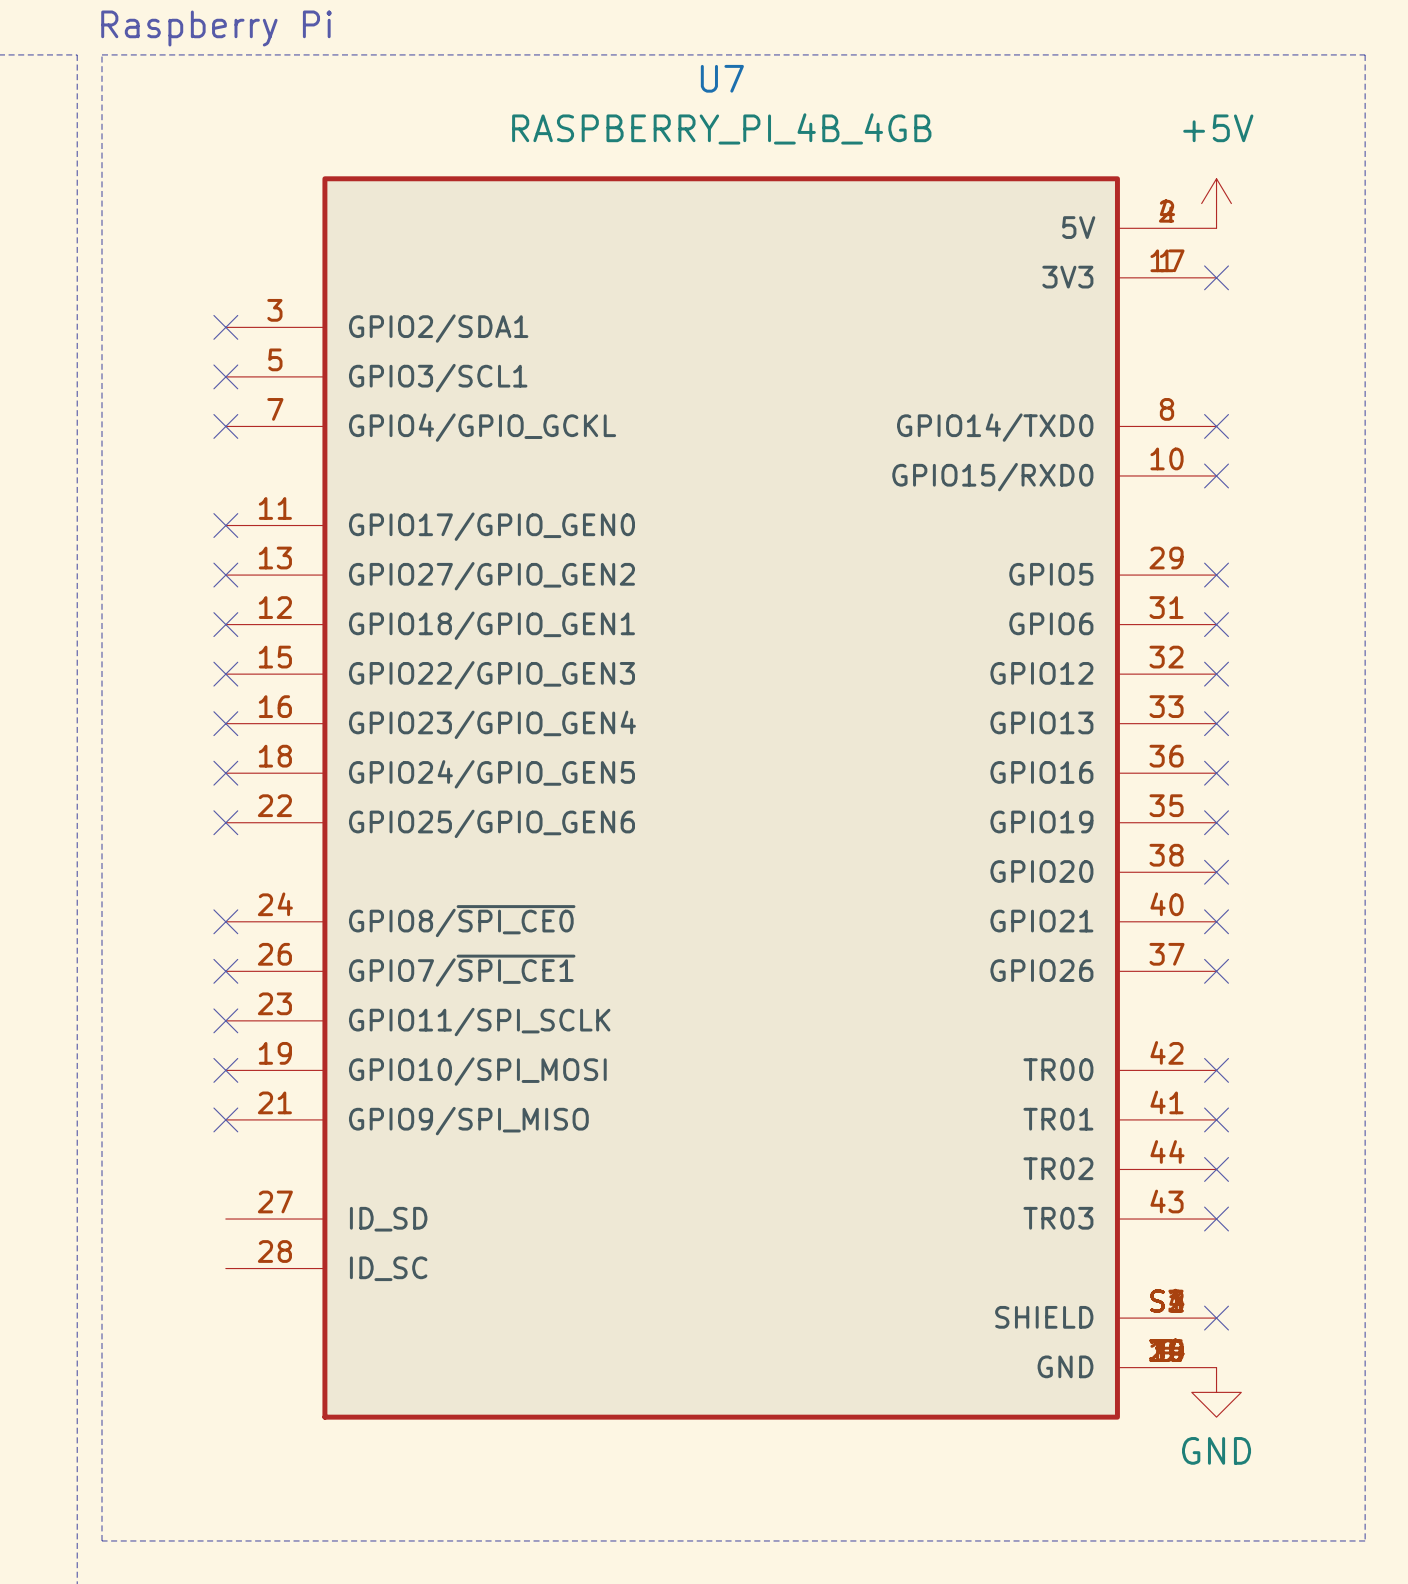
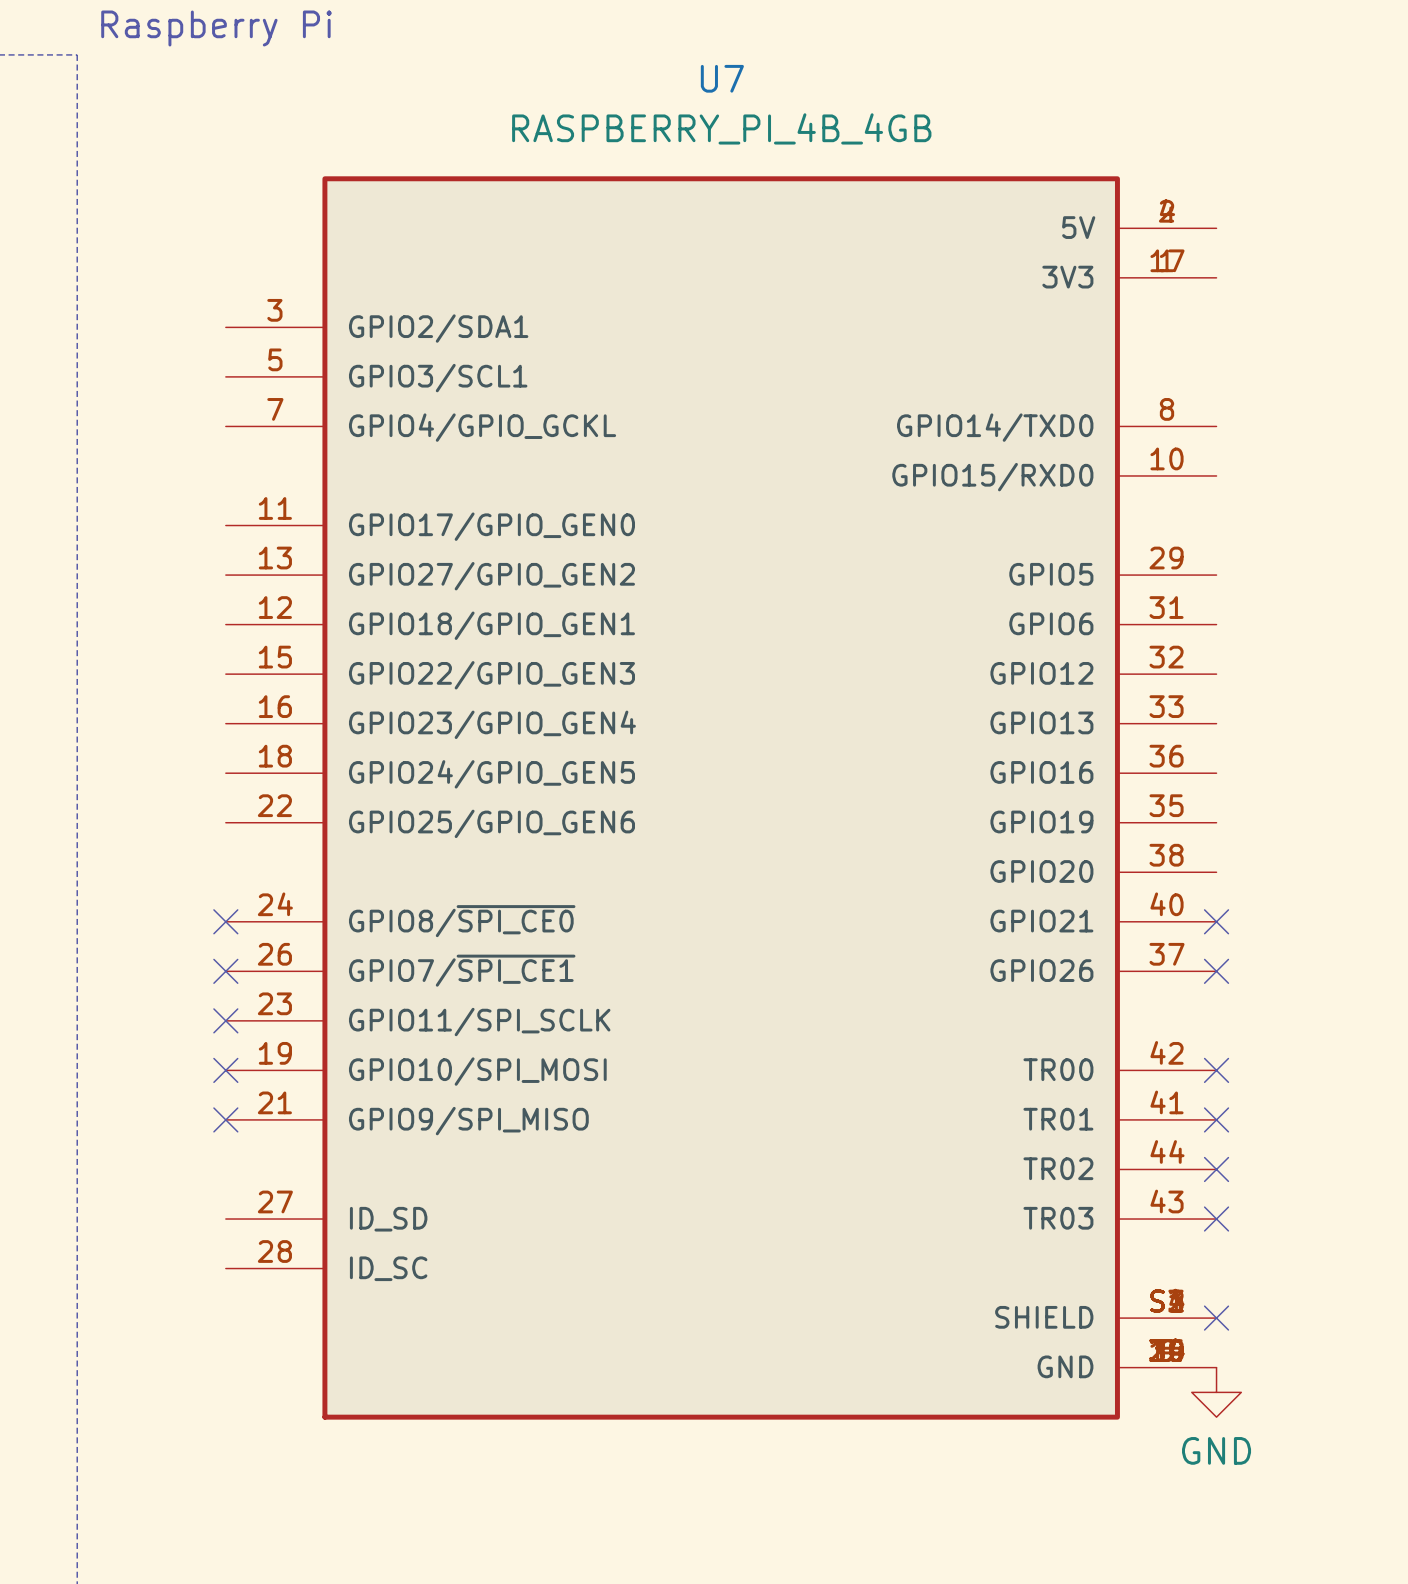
line: (102, 54) (1365, 54) (1365, 1540) (102, 1540) (102, 54) -> none
power symbol: +5V (1216, 203) -> none
no-connect mark: (1216, 277) -> none
no-connect mark: (225, 327) -> none
no-connect mark: (225, 376) -> none
no-connect mark: (225, 426) -> none
no-connect mark: (1216, 426) -> none
no-connect mark: (1216, 475) -> none
no-connect mark: (225, 525) -> none
no-connect mark: (225, 575) -> none
no-connect mark: (1216, 575) -> none
no-connect mark: (225, 624) -> none
no-connect mark: (1216, 624) -> none
no-connect mark: (225, 674) -> none
no-connect mark: (1216, 674) -> none
no-connect mark: (225, 723) -> none
no-connect mark: (1216, 723) -> none
no-connect mark: (225, 773) -> none
no-connect mark: (1216, 773) -> none
no-connect mark: (225, 822) -> none
no-connect mark: (1216, 822) -> none
no-connect mark: (1216, 872) -> none

